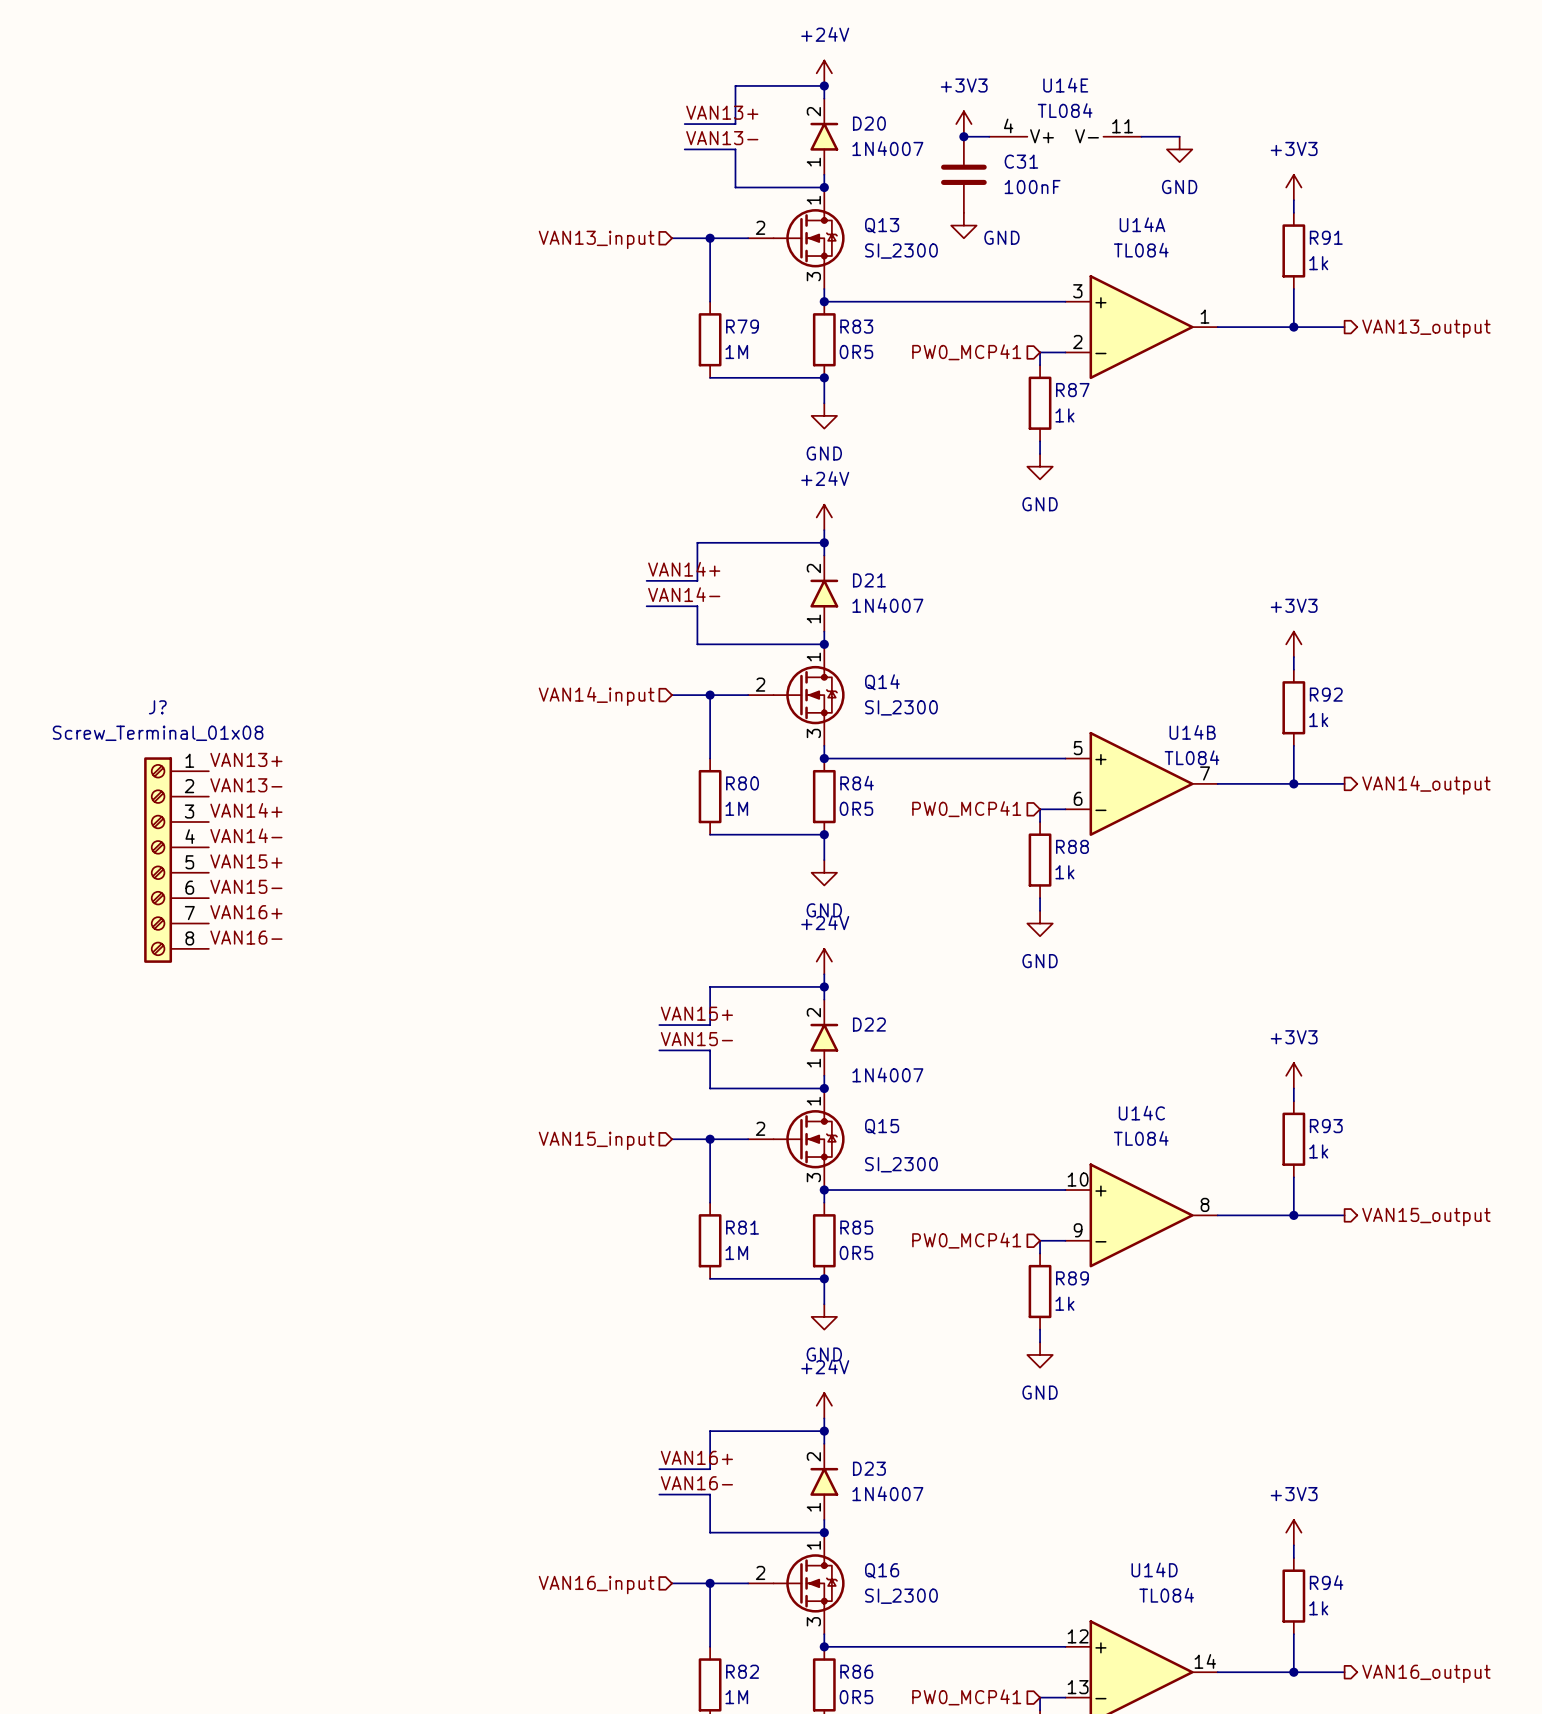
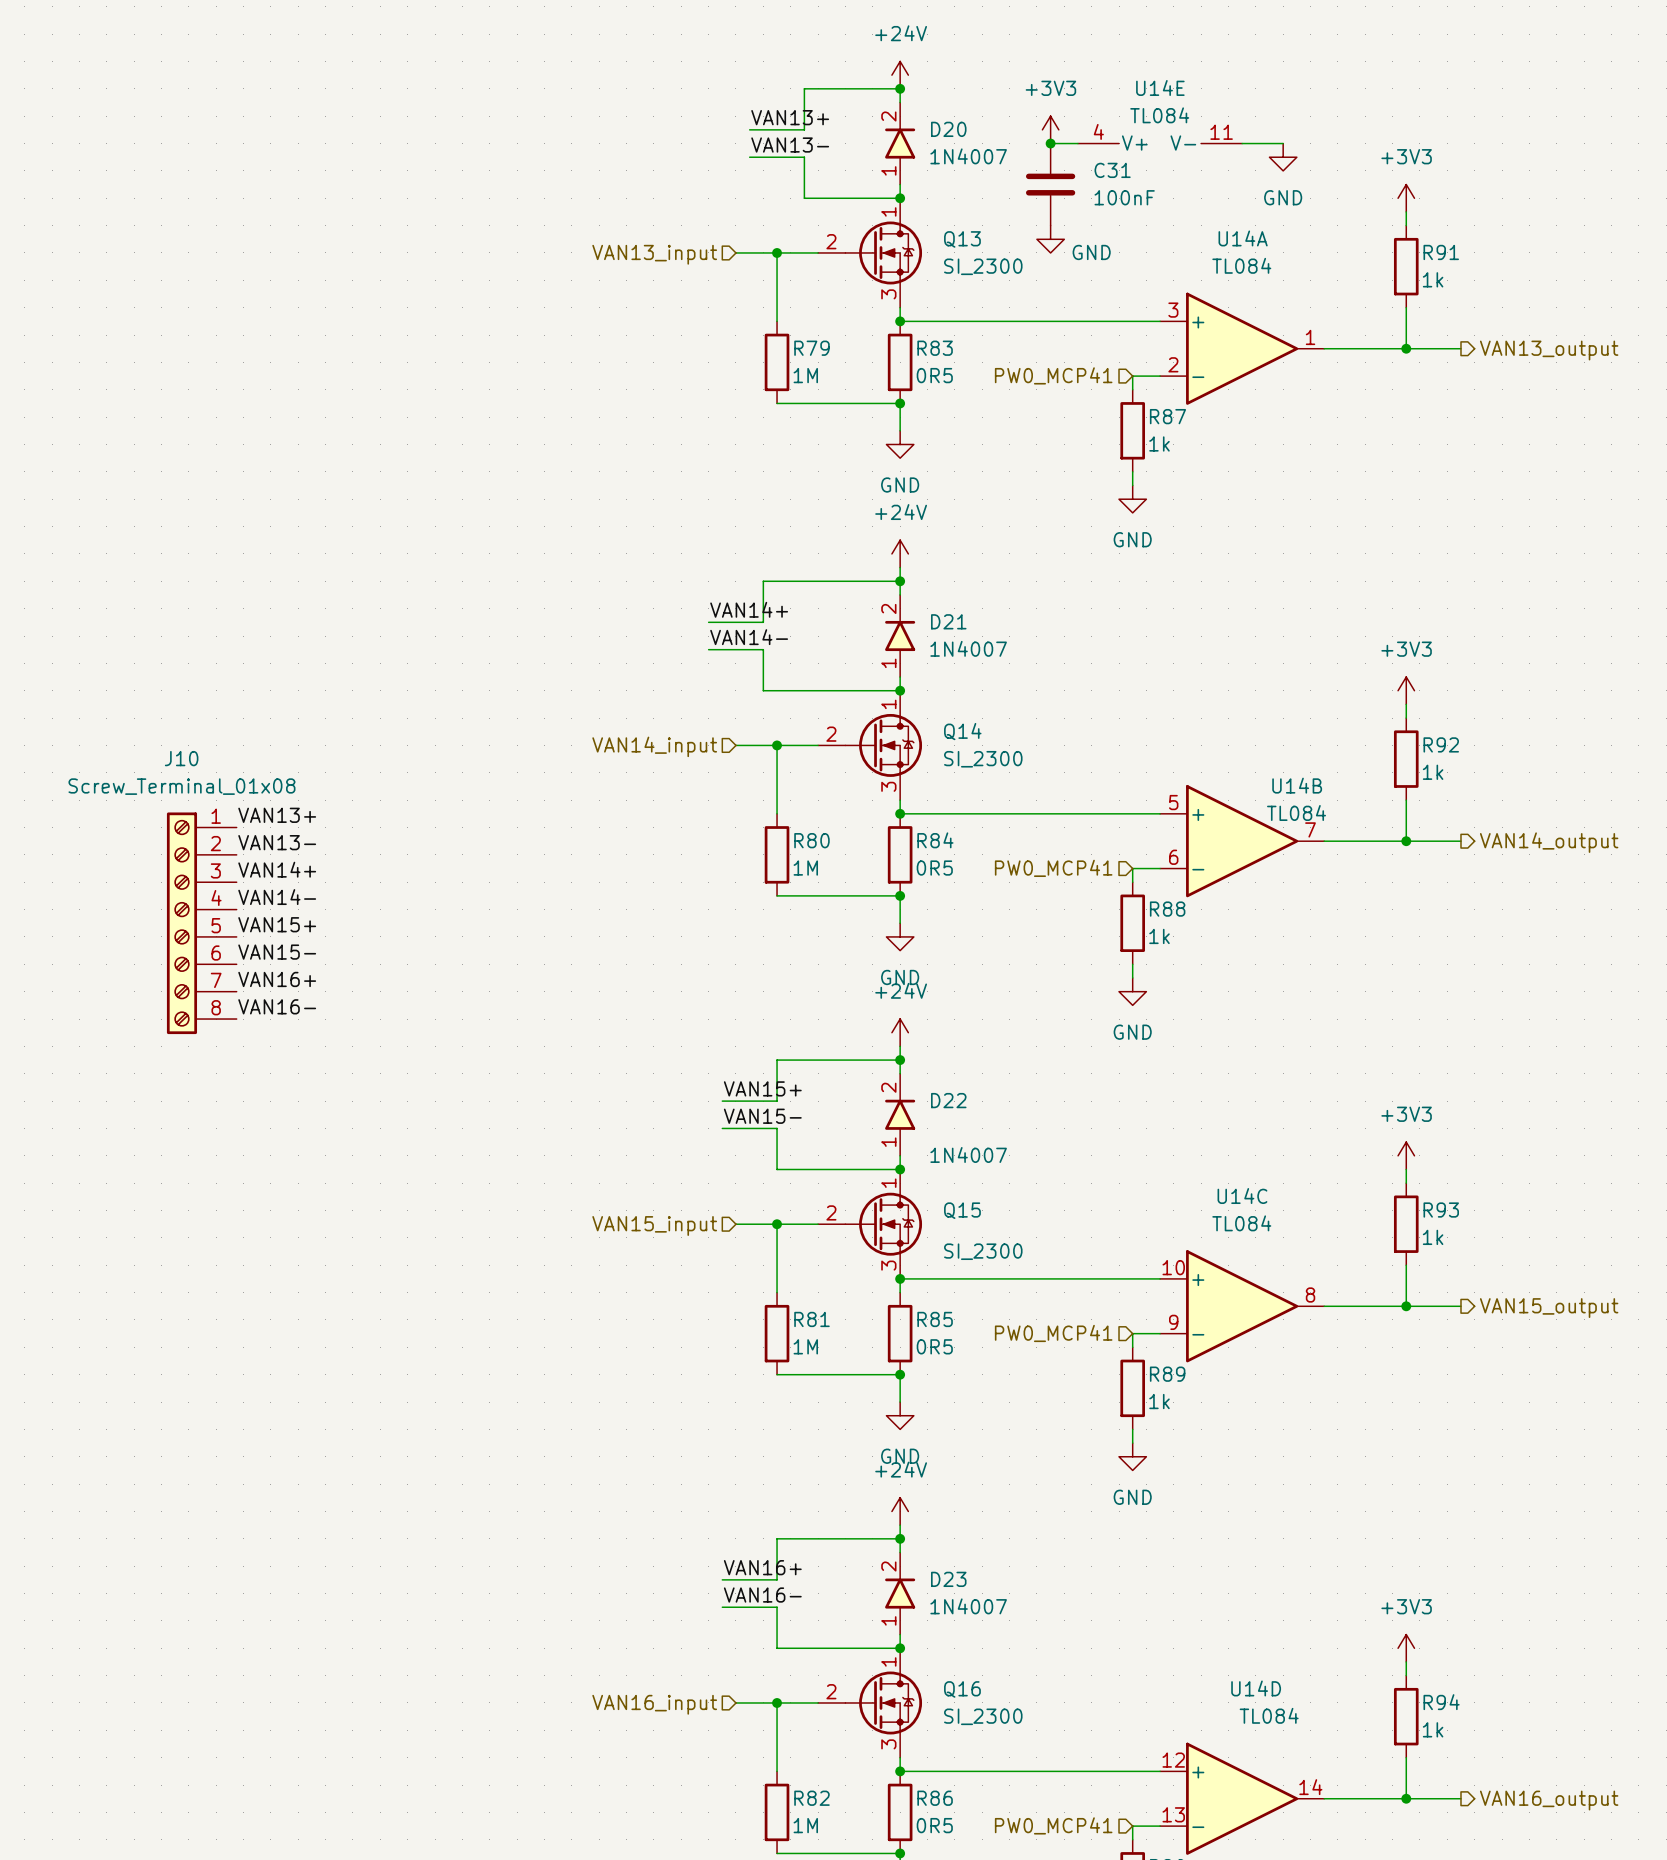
J? name: J? (157, 707) -> J10 (181, 758)

